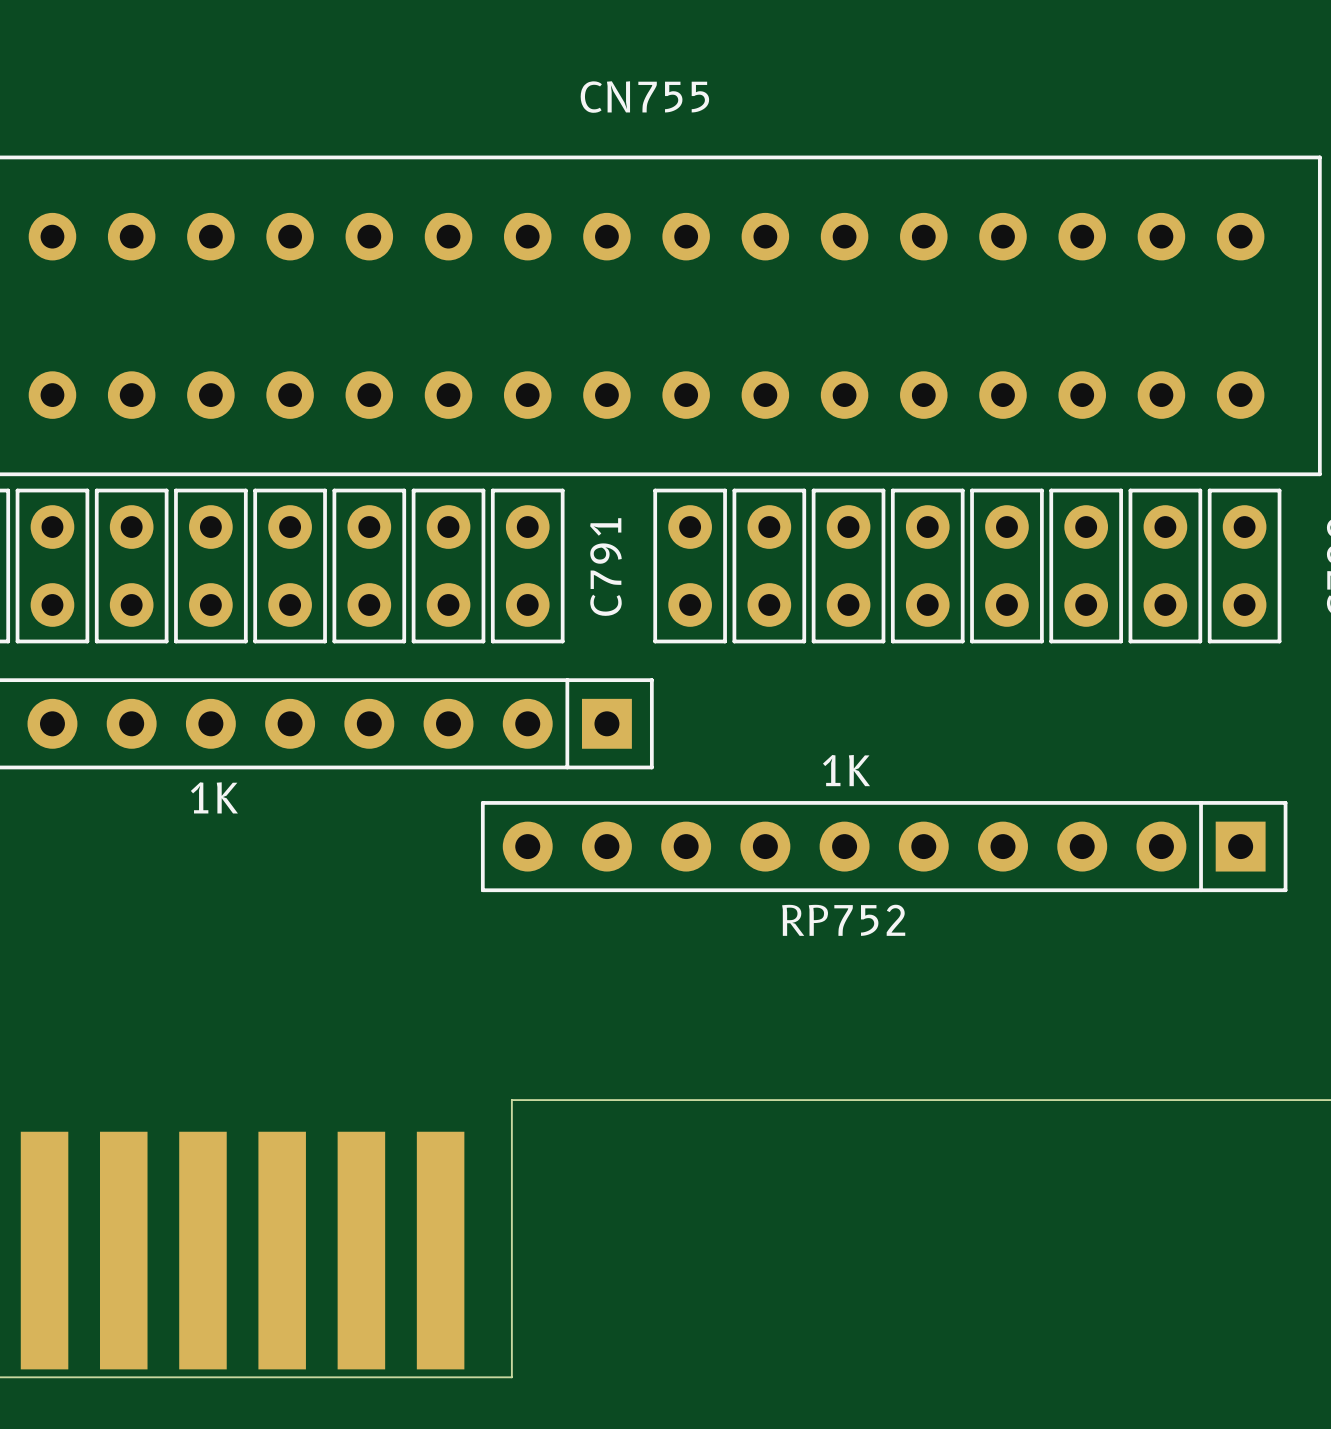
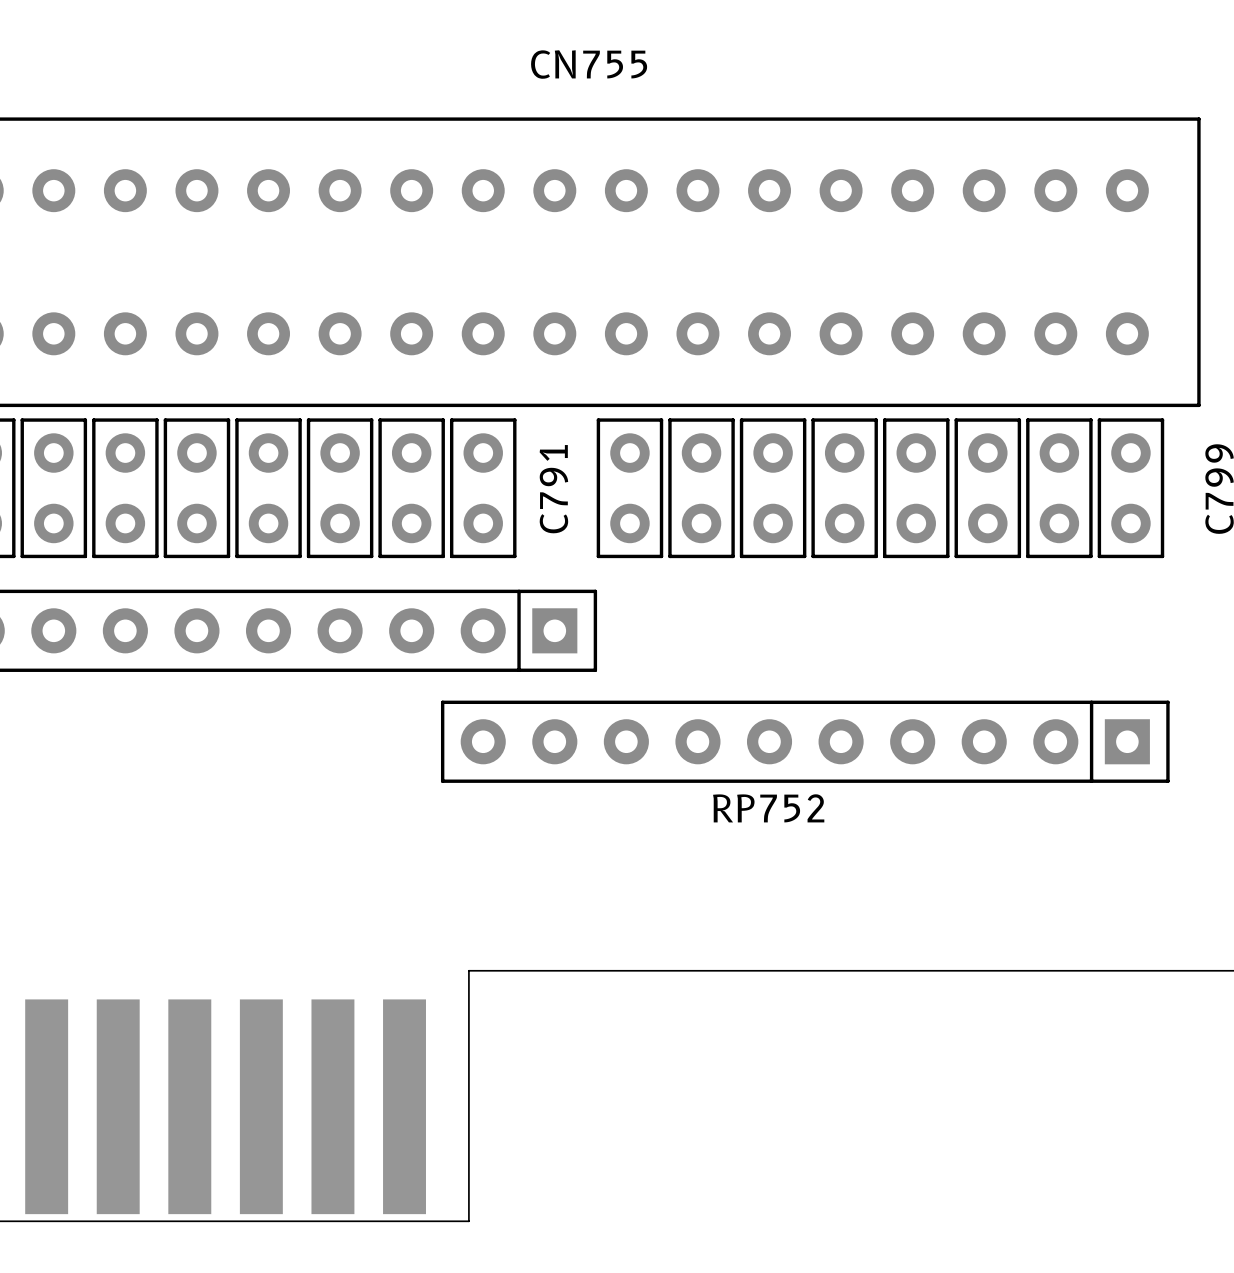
RP752 value: 1K (846, 770) -> none
part value: 1K (214, 797) -> none

